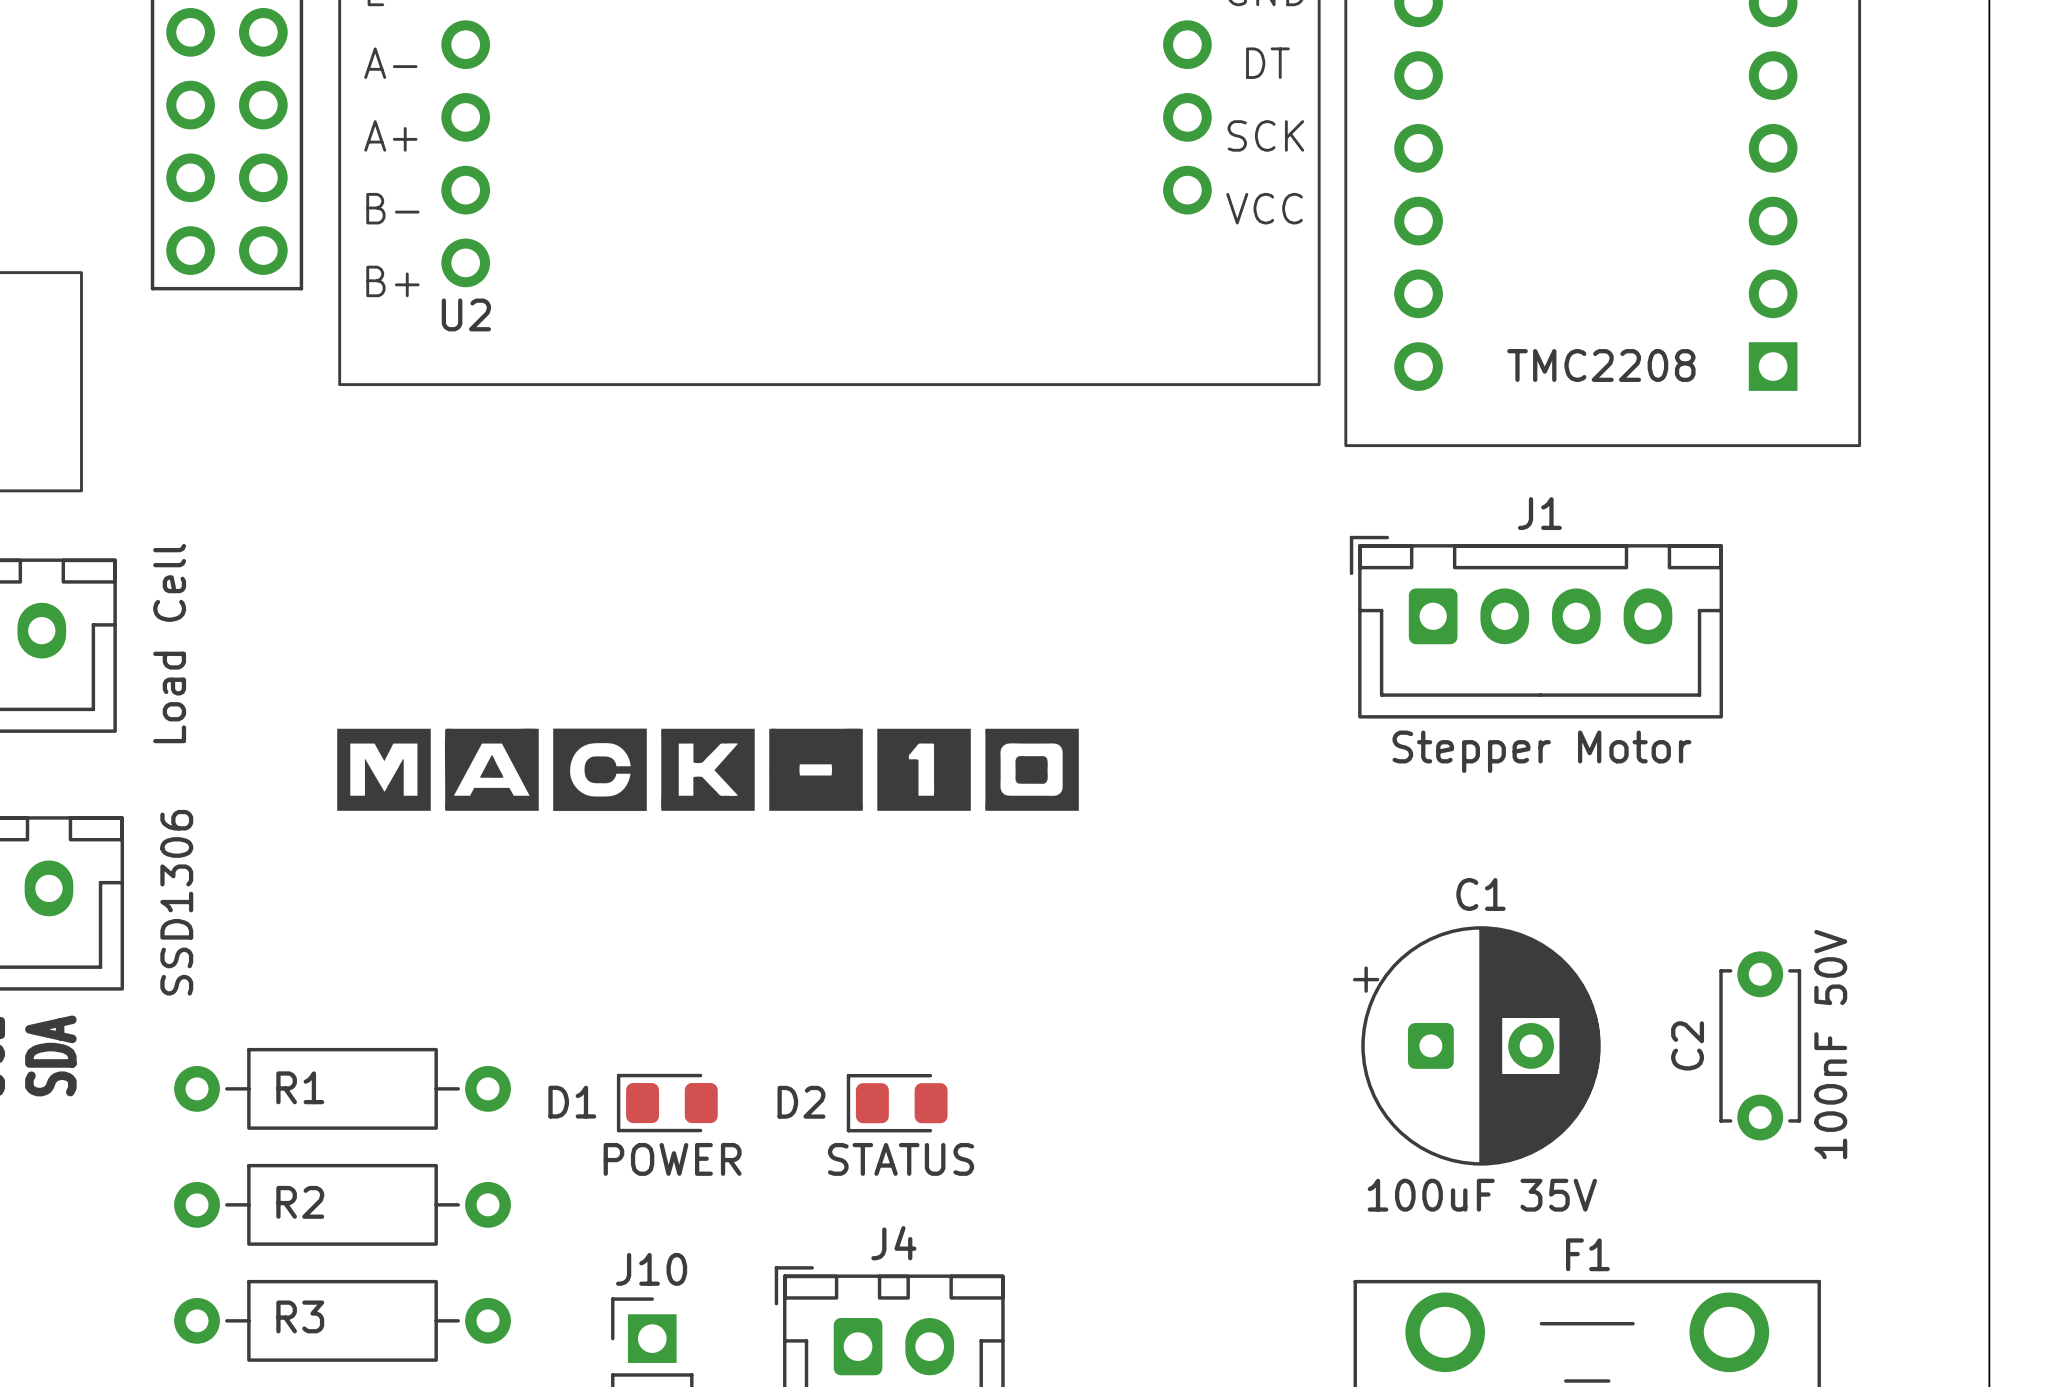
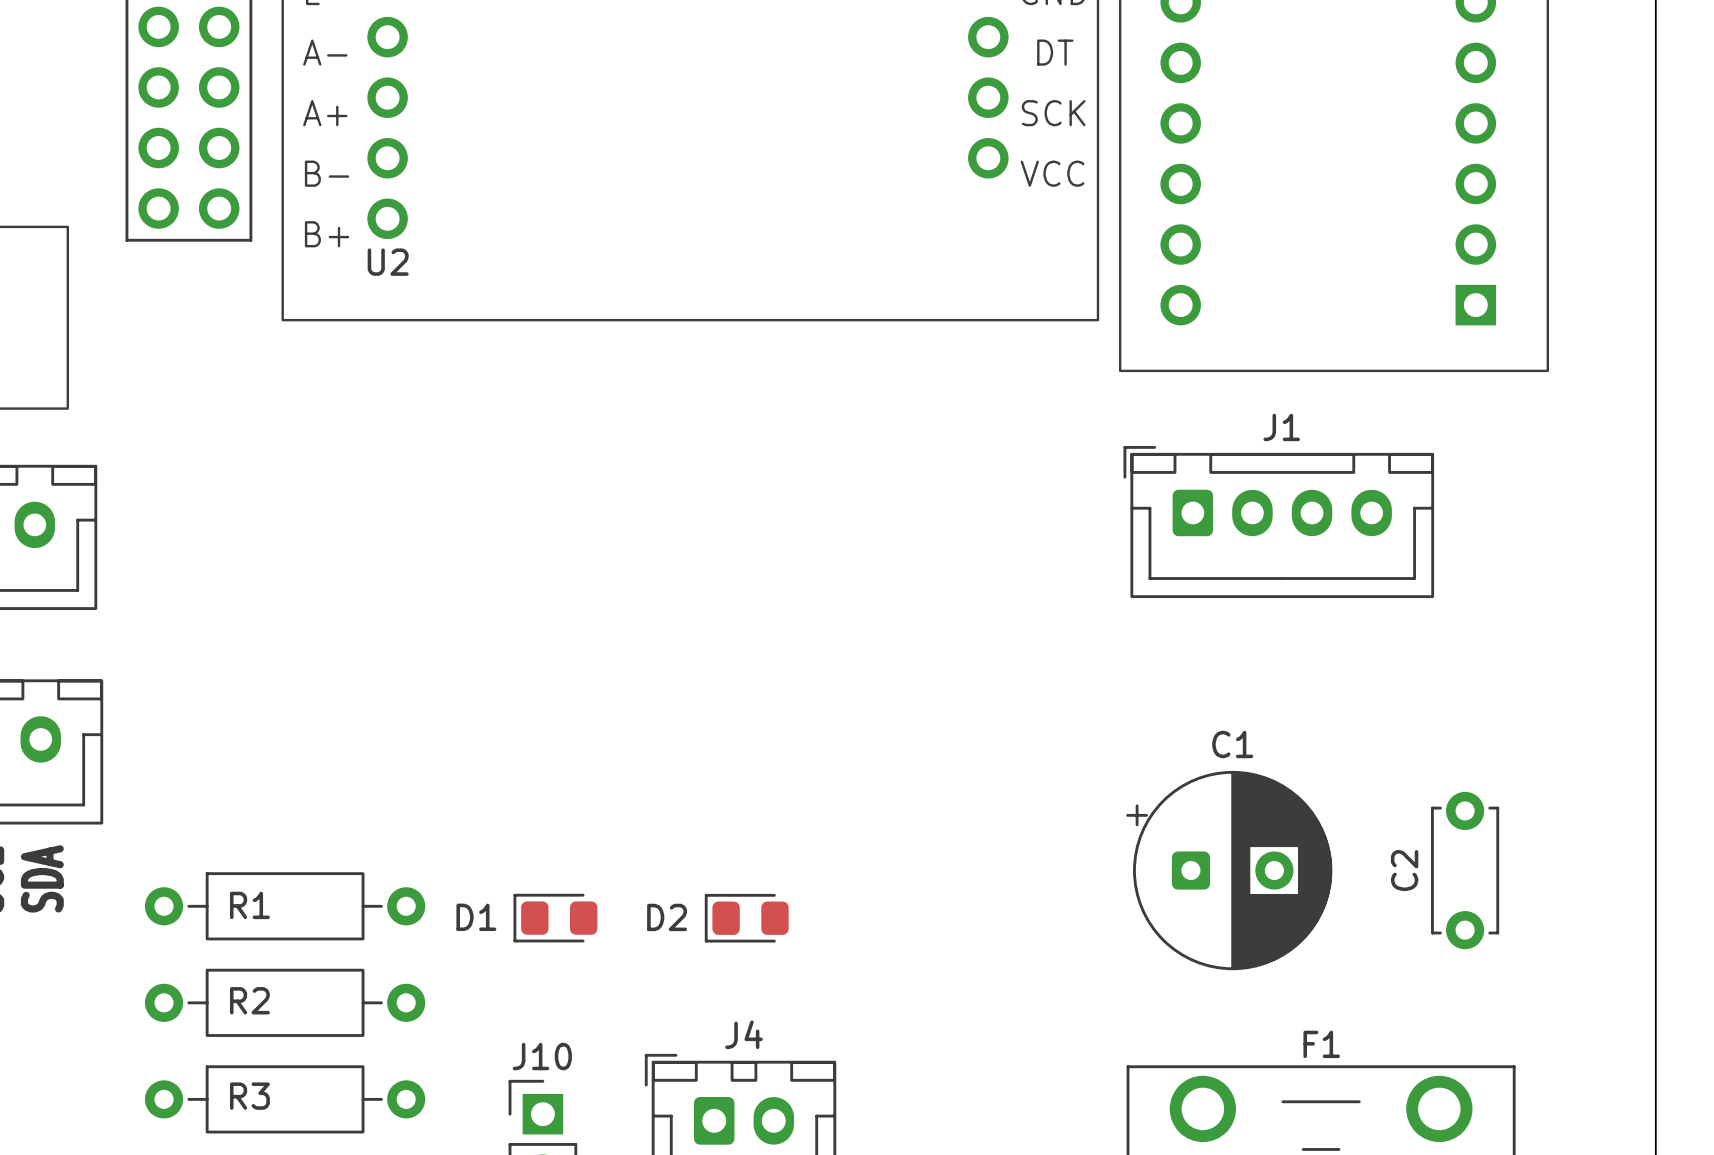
part value: TMC2208 (1601, 365) -> none
part value: Load Cell (169, 643) -> none
drawing: [337, 728, 1079, 811] -> none
J1 value: Stepper Motor (1541, 751) -> none
part value: SSD1306 (176, 902) -> none
C2 value: 100nF 50V (1830, 1044) -> none
D1 value: POWER (672, 1159) -> none
D2 value: STATUS (901, 1159) -> none
C1 value: 100uF 35V (1482, 1195) -> none

